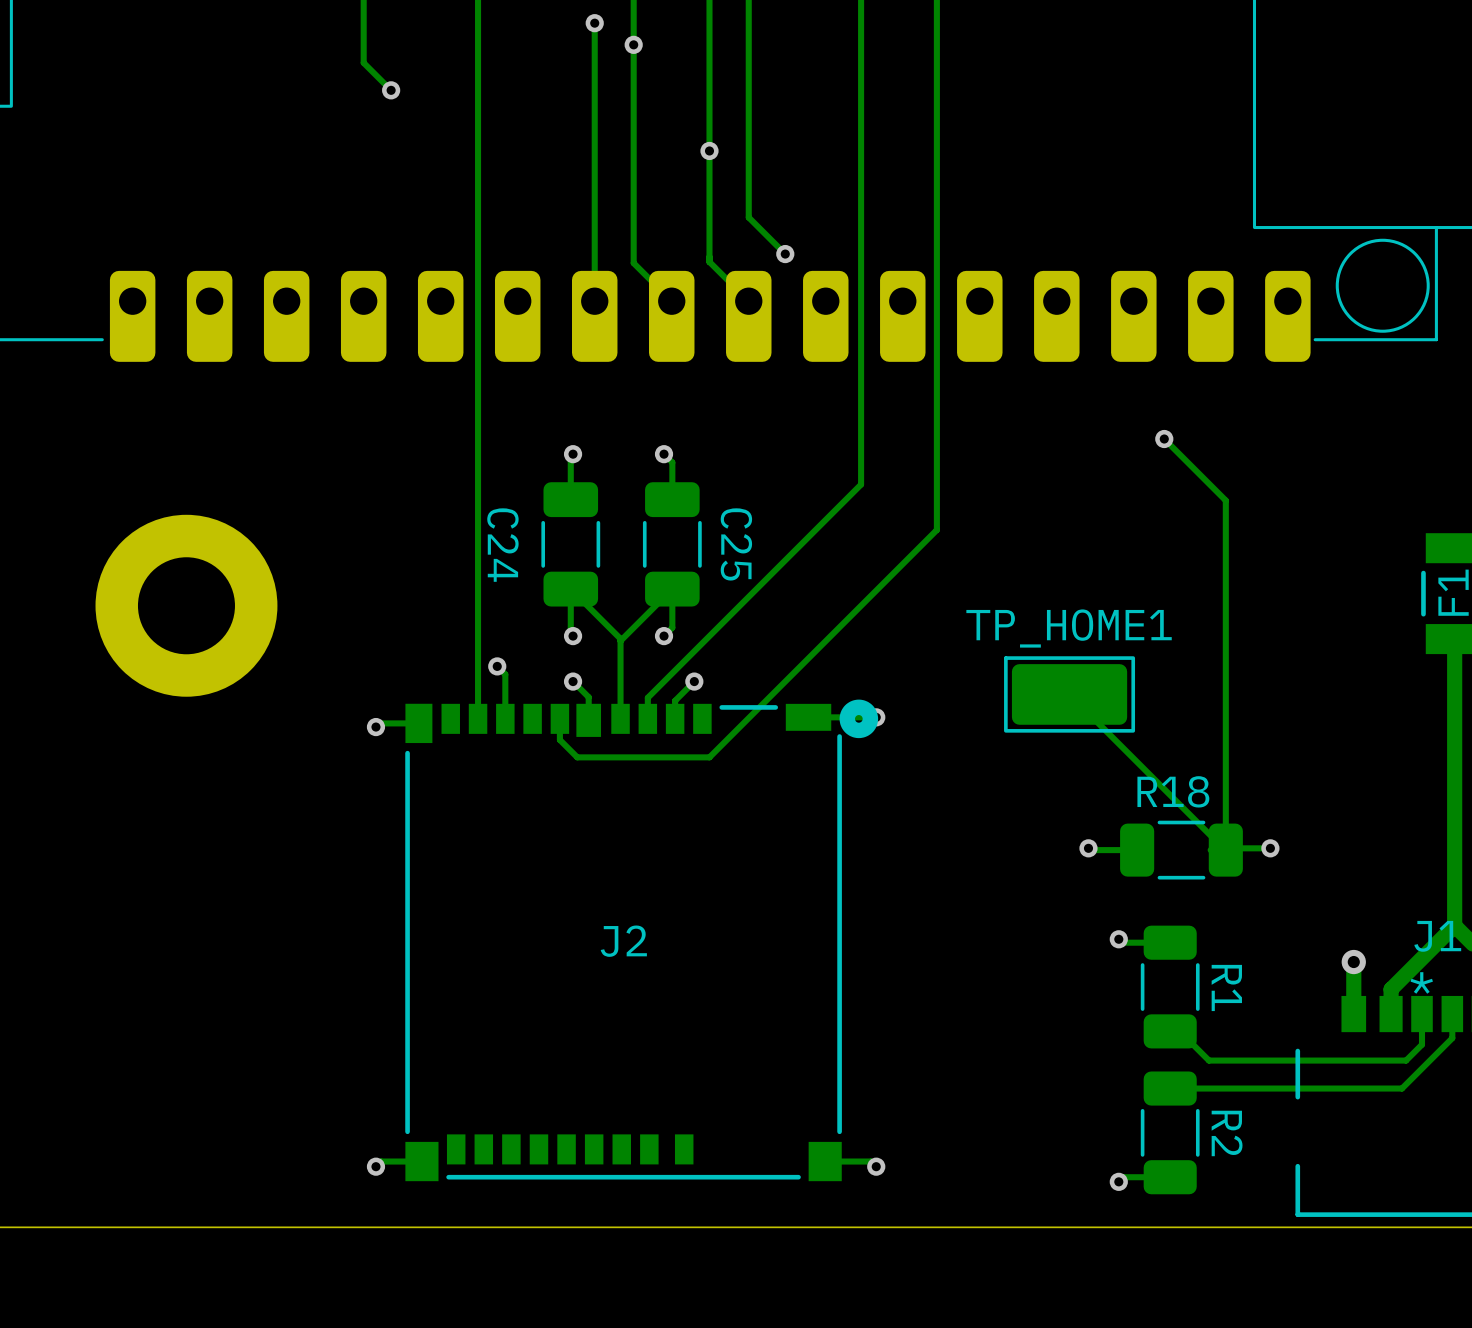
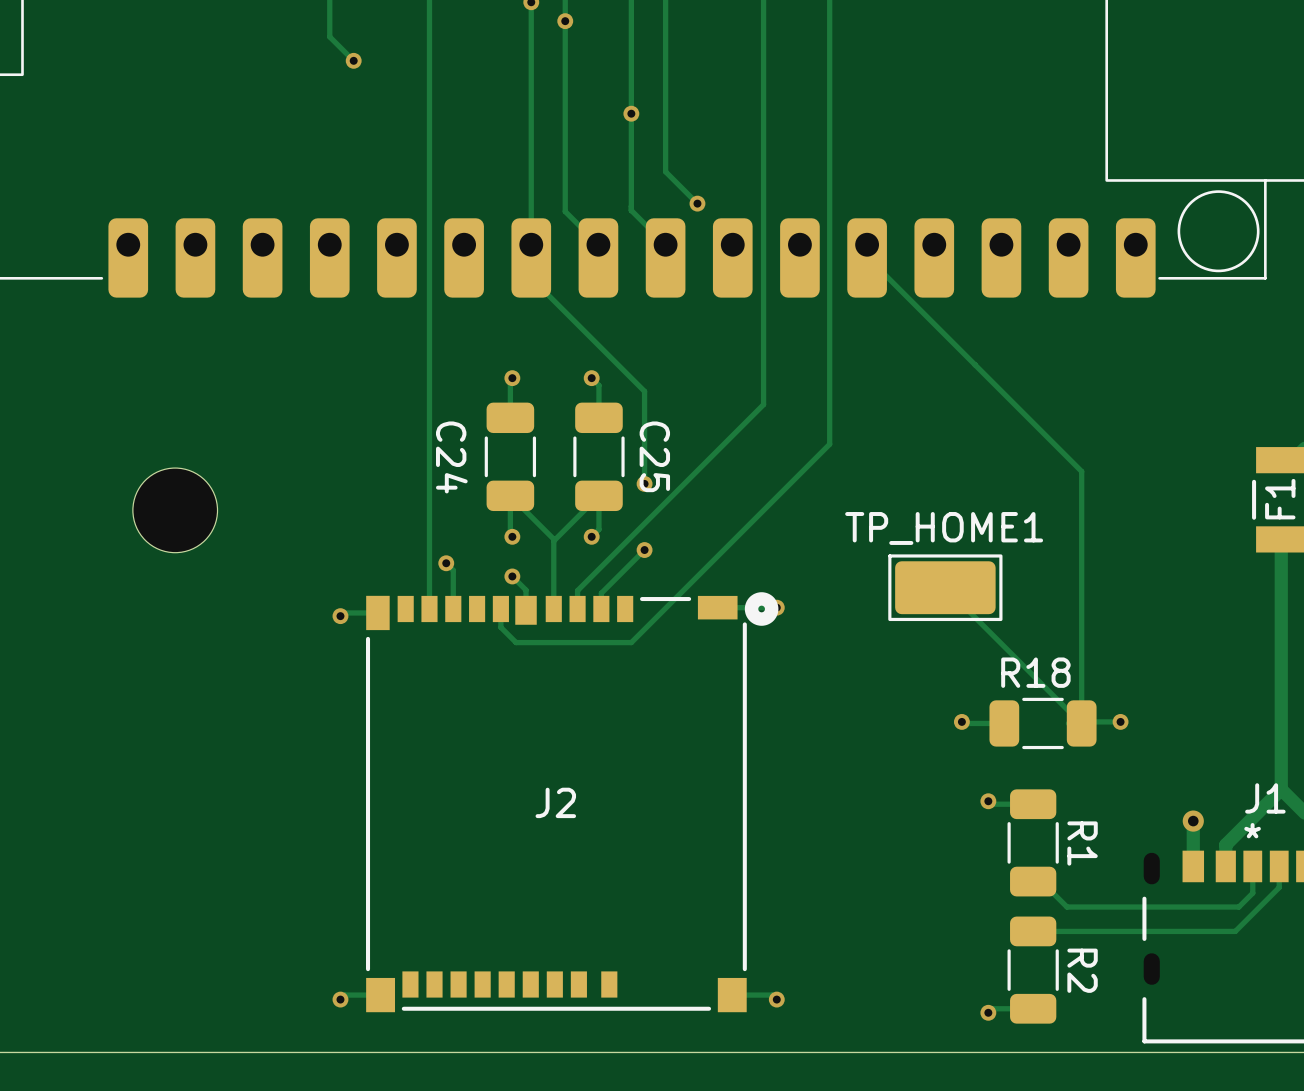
track: none -> (531, 278) (644, 391) (644, 483)
track: (1164, 439) (1225, 500) (1225, 561) -> (867, 244) (867, 256) (1081, 471)
via: (1164, 439) -> none
part footprint: [95, 514, 278, 697] -> [132, 468, 218, 553]
via: none -> (644, 483)
track: none -> (644, 550) (618, 576)
via position: (694, 681) -> (644, 550)

